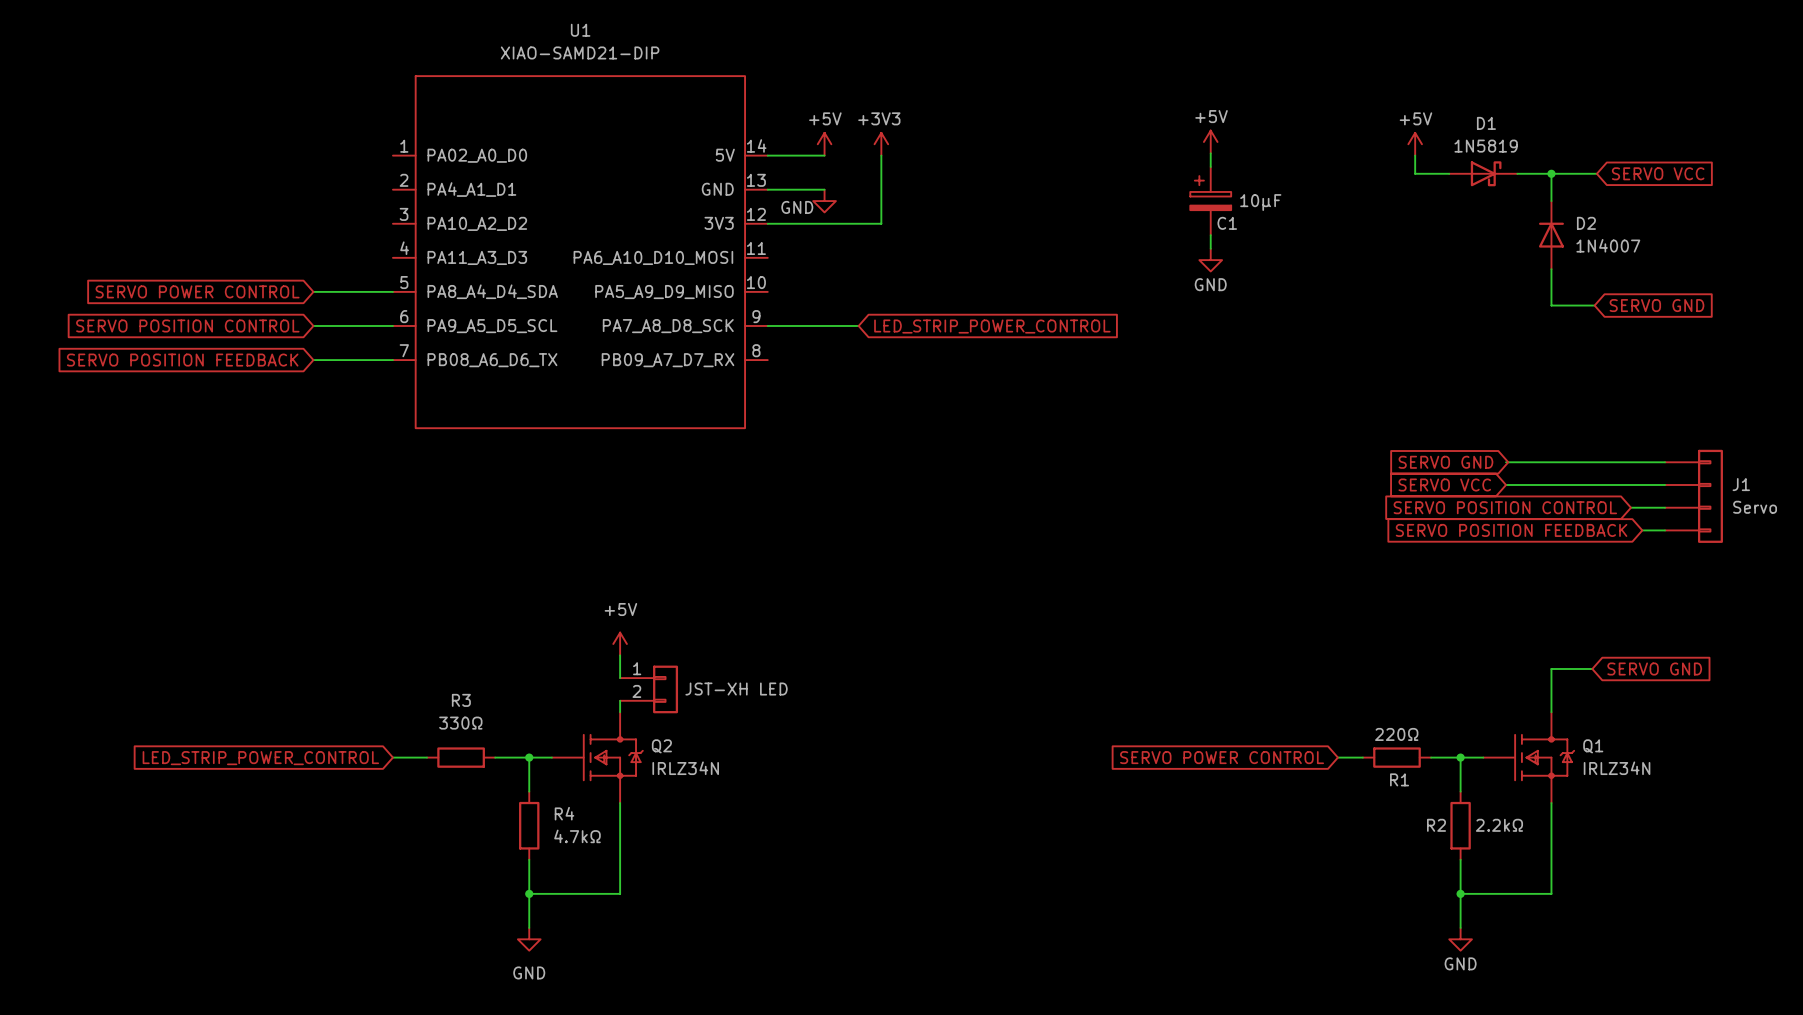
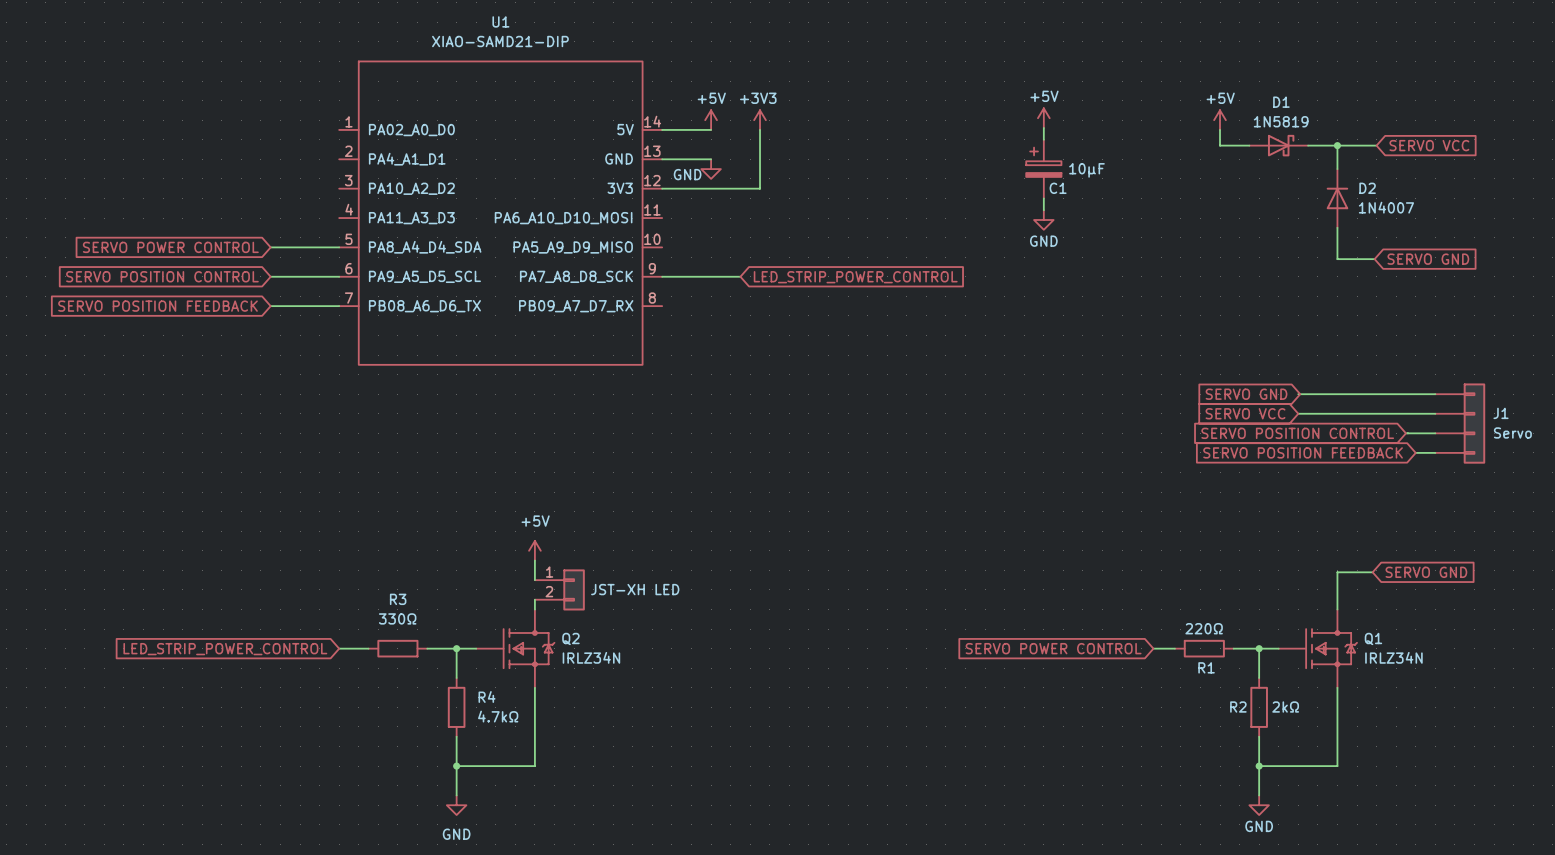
R2 value: 2.2kΩ (1499, 825) -> 2kΩ (1285, 707)

